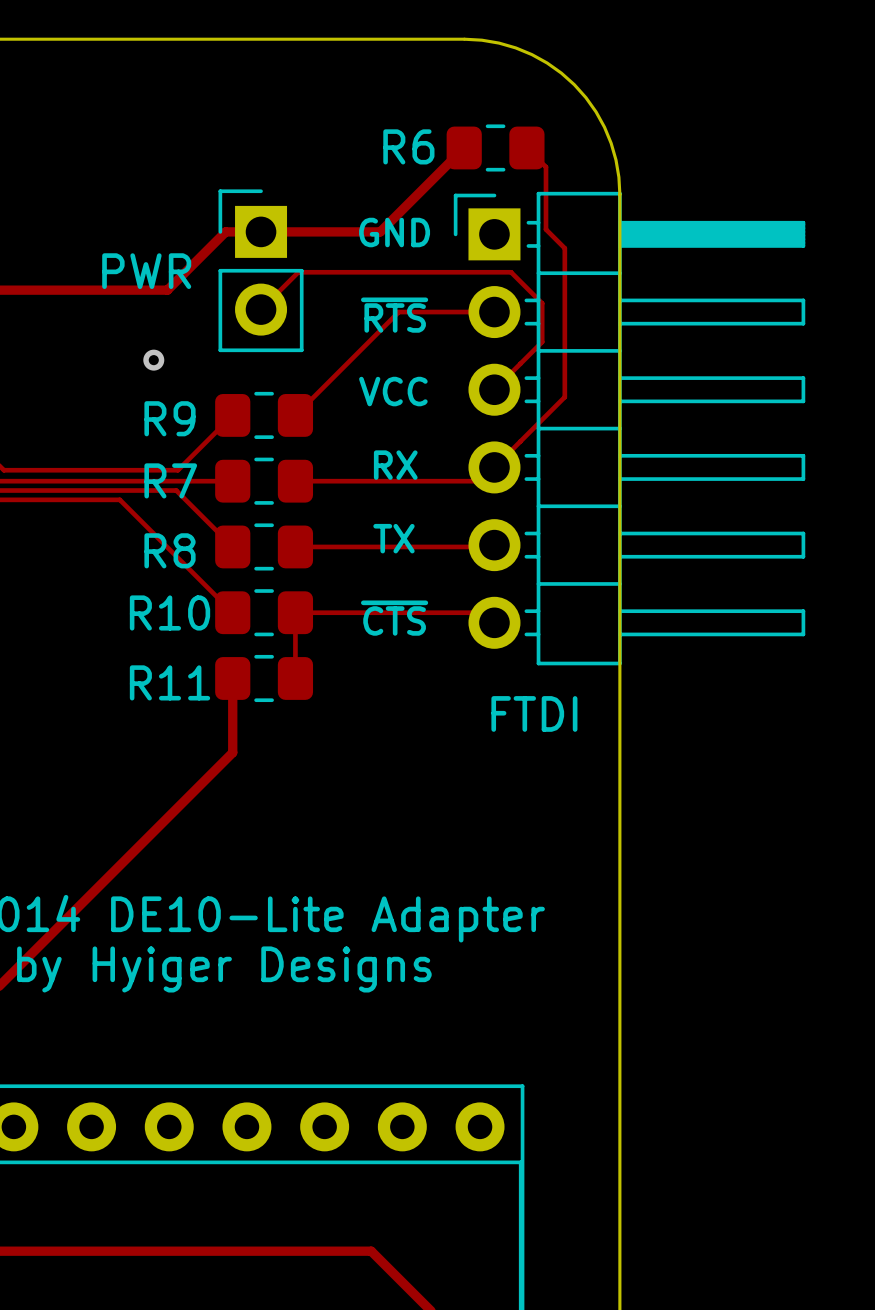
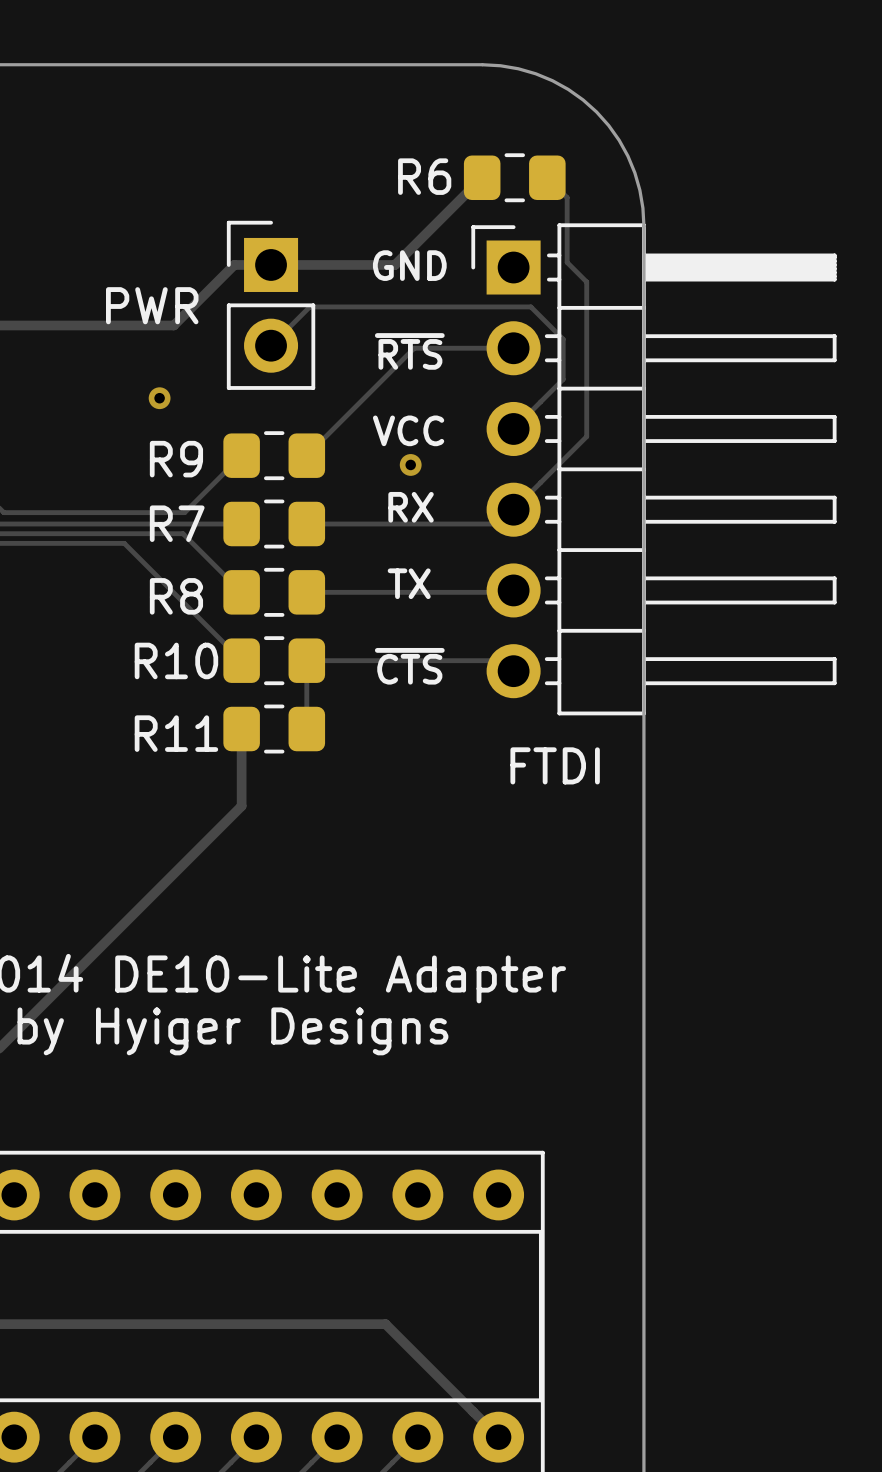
via: none -> (410, 464)

